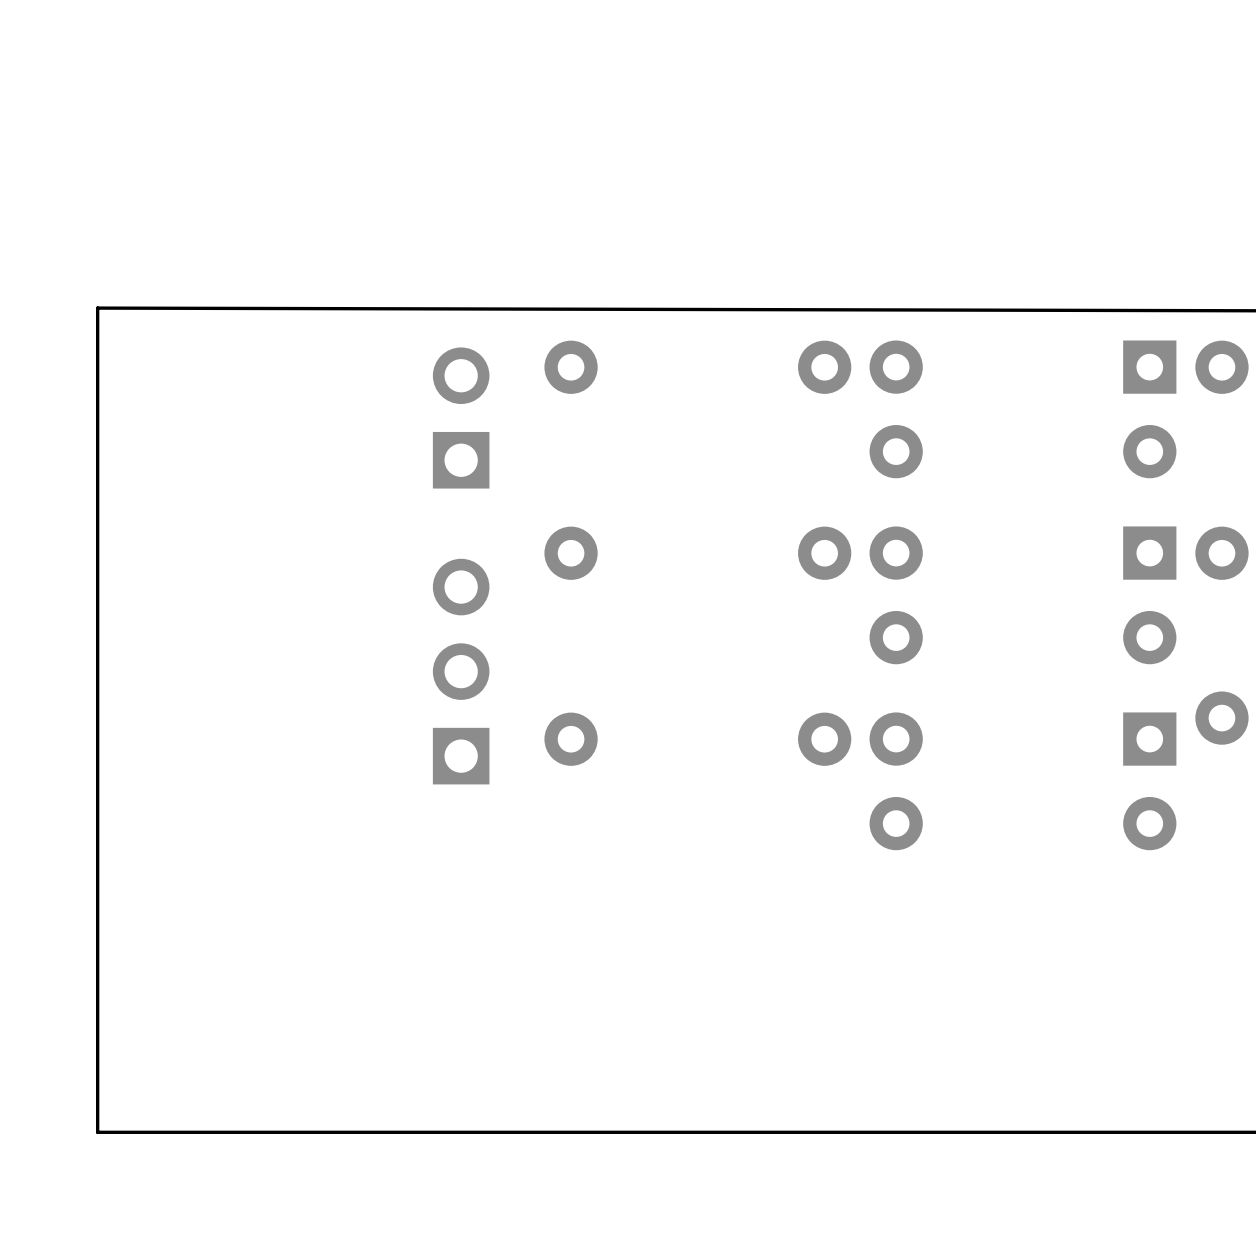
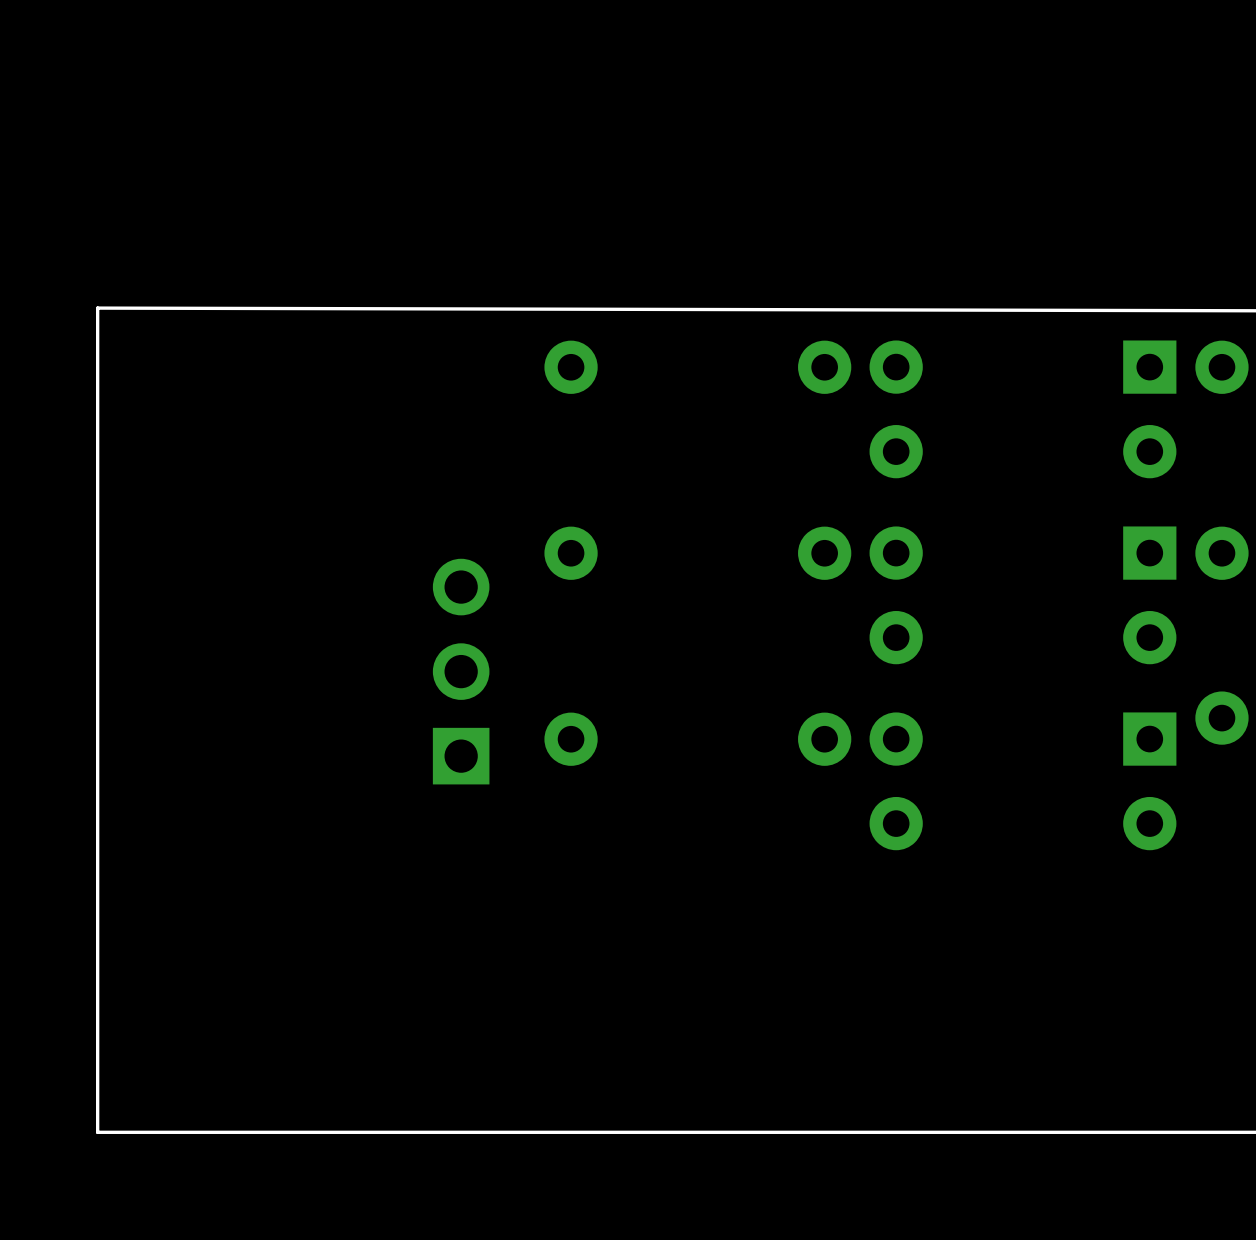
part: (461, 417) -> none

